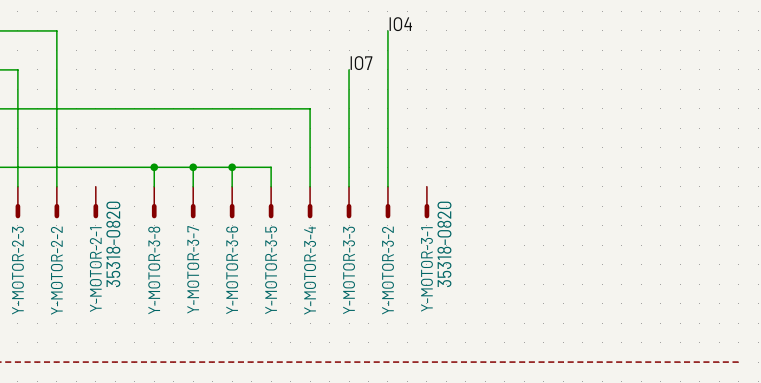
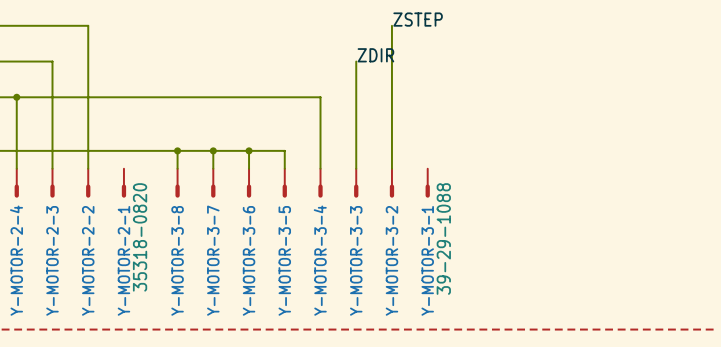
label: IO4 (400, 24) -> ZSTEP (418, 19)
label: IO7 (361, 63) -> ZDIR (375, 55)
Y-MOTOR-3-1 value: 35318-0820 (444, 244) -> 39-29-1088 (443, 239)

